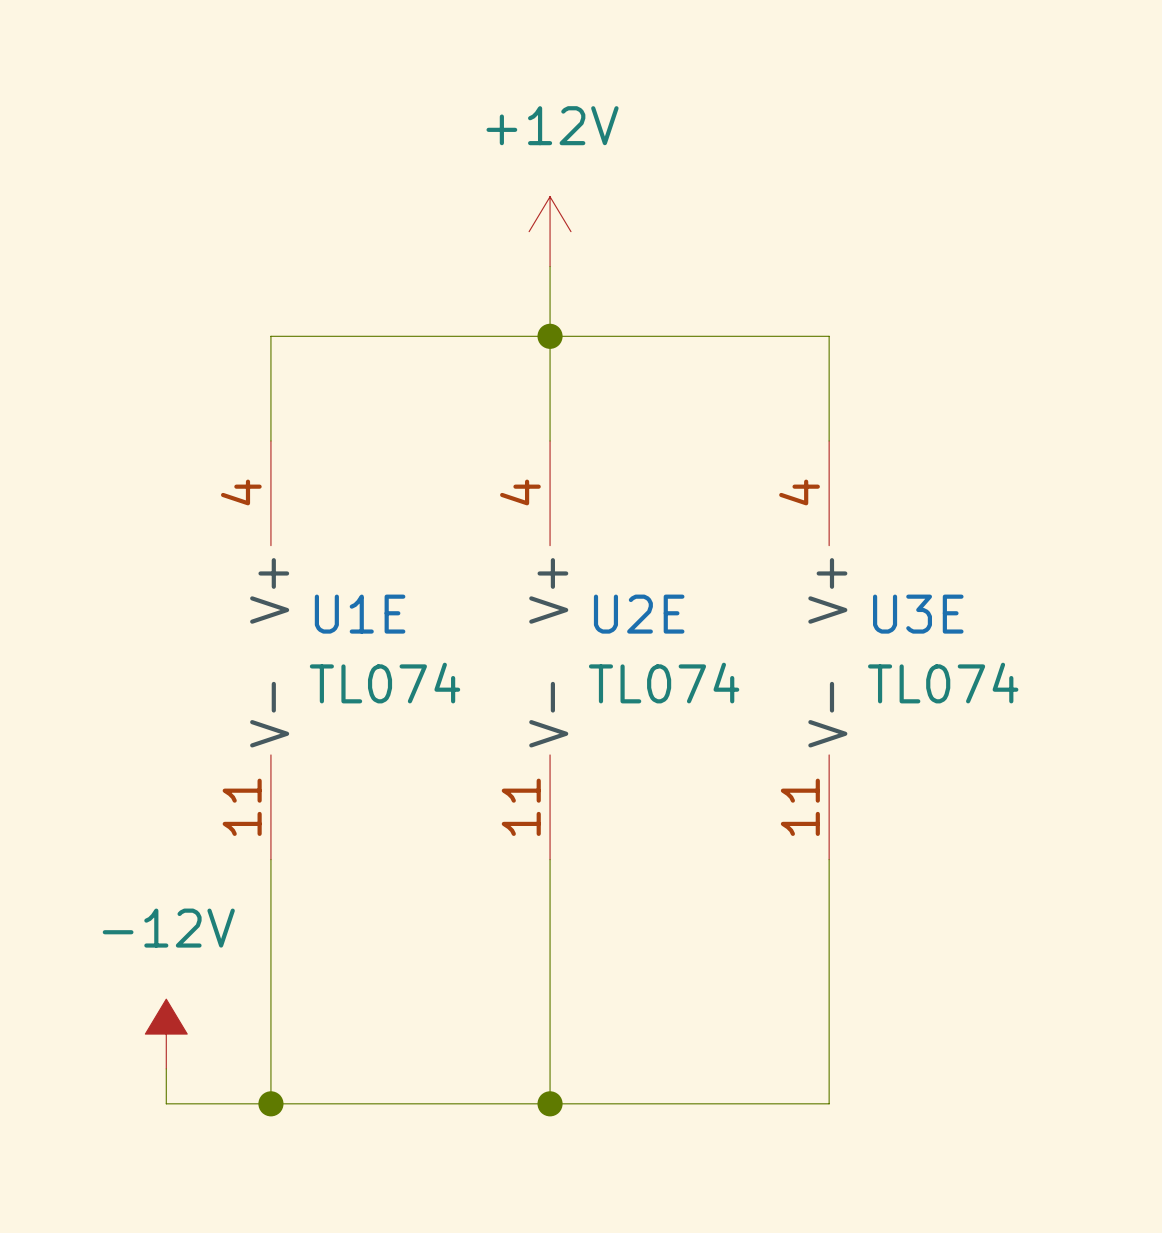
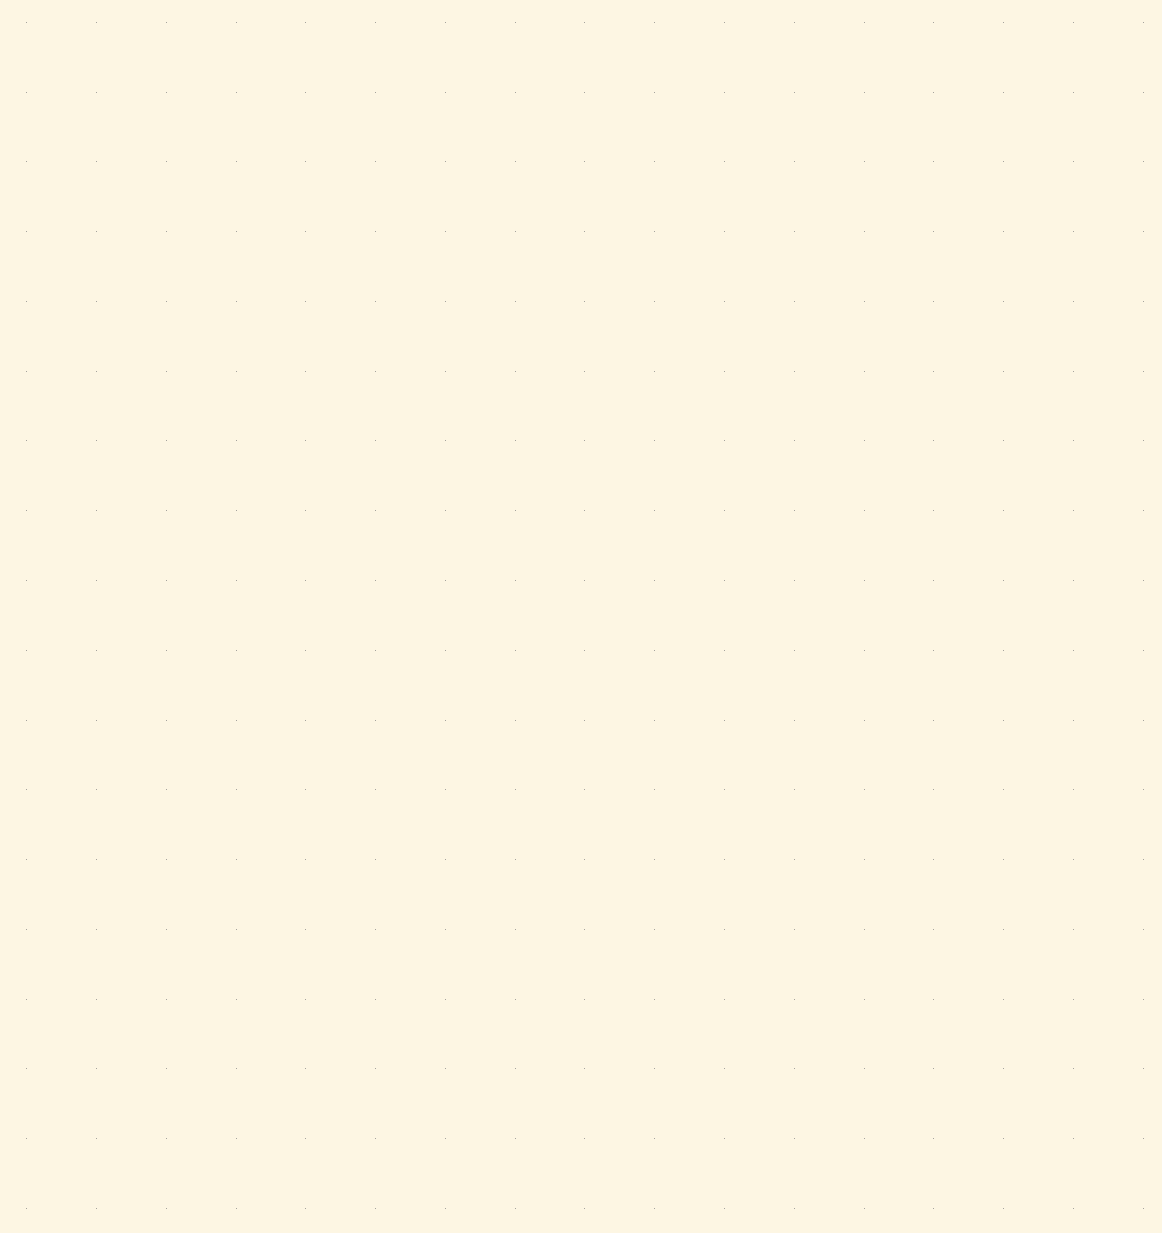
power symbol: +12V (550, 231) -> none
wire: (550, 266) (550, 440) -> none
junction: (550, 336) -> none
wire: (270, 440) (270, 336) (829, 336) (829, 440) -> none
U1E: TL074 (270, 650) -> none
U2E: TL074 (550, 650) -> none
U3E: TL074 (829, 650) -> none
wire: (270, 859) (270, 1103) -> none
wire: (550, 859) (550, 1103) -> none
wire: (829, 859) (829, 1103) (166, 1103) (166, 1068) -> none
power symbol: -12V (166, 1034) -> none
junction: (270, 1103) -> none
junction: (550, 1103) -> none

